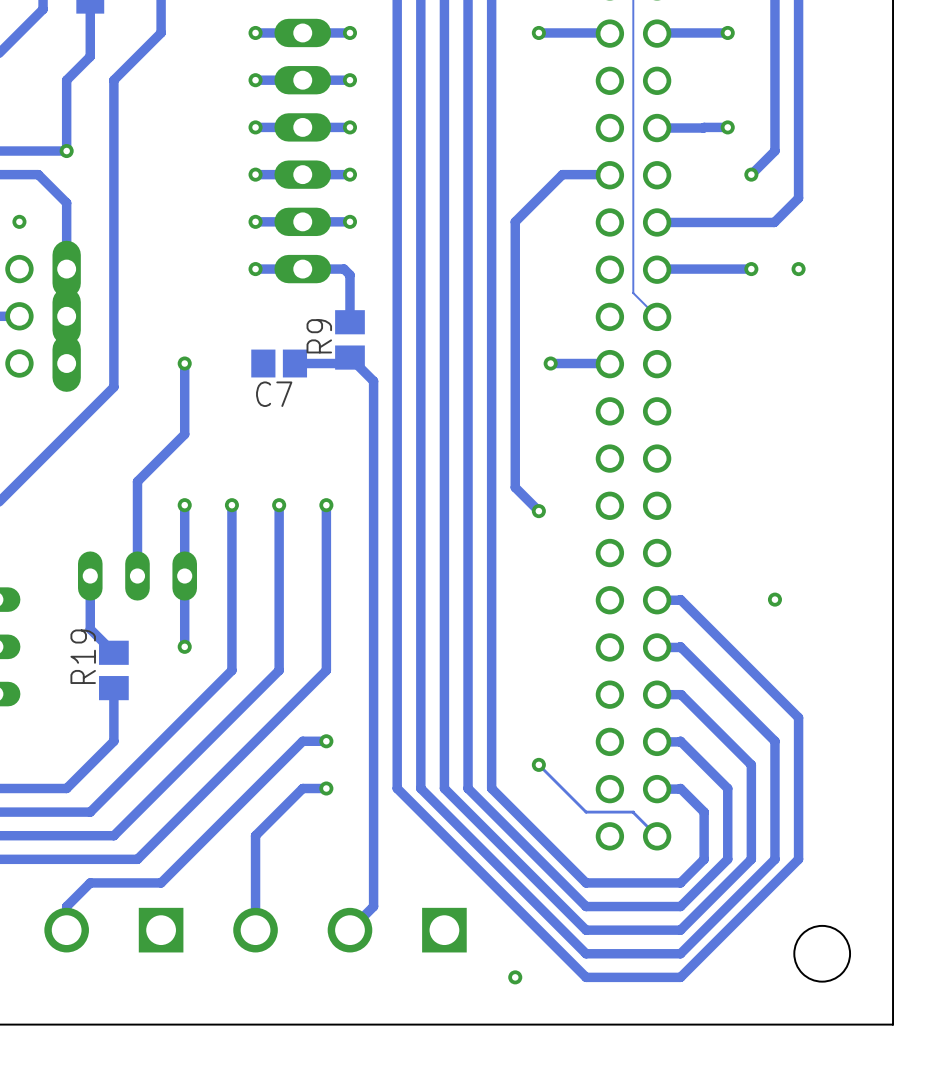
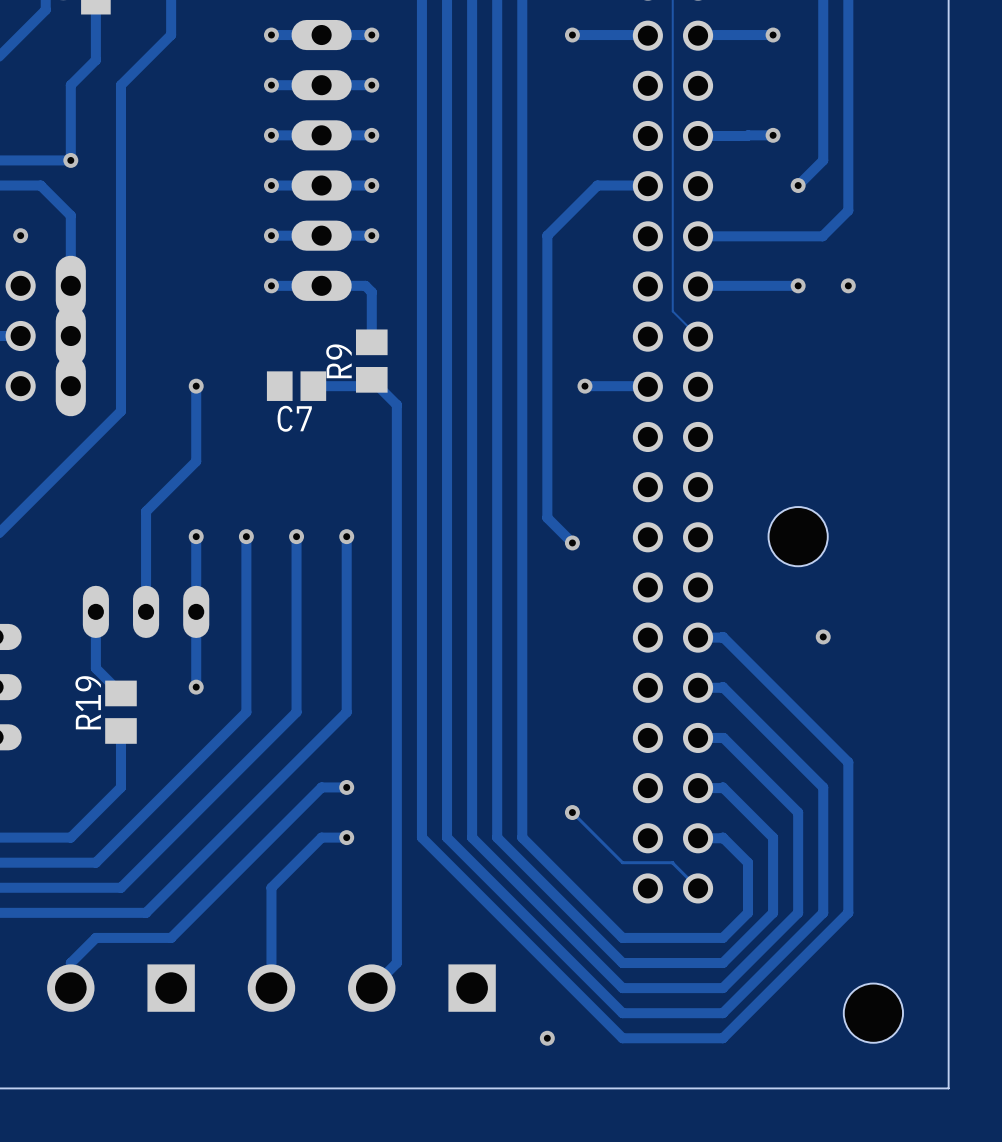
hole: none -> (798, 536)

